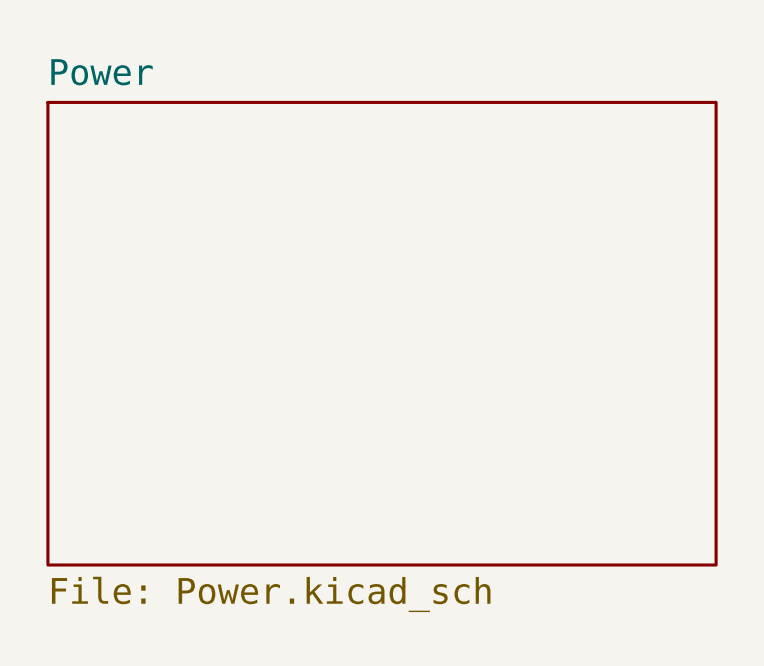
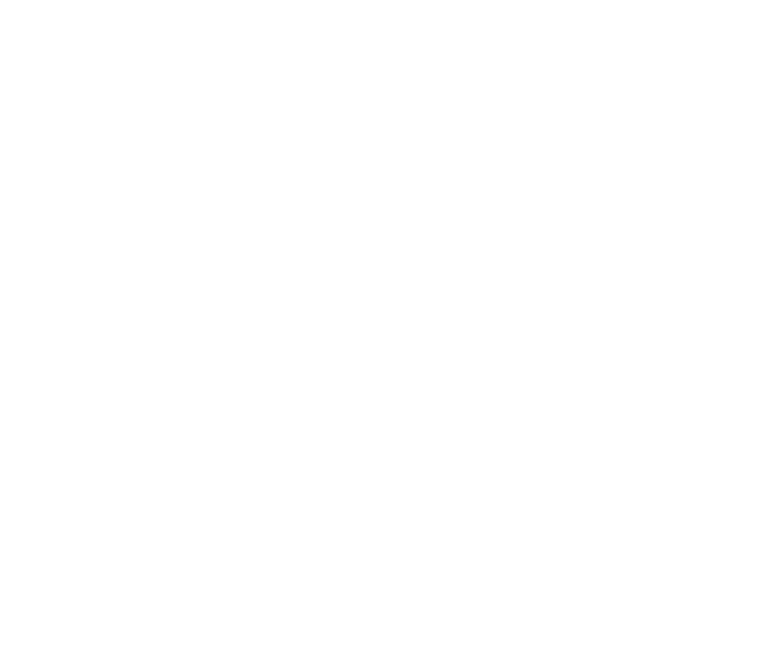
sheet Power: File: Power.kicad_sch (382, 333) -> none

